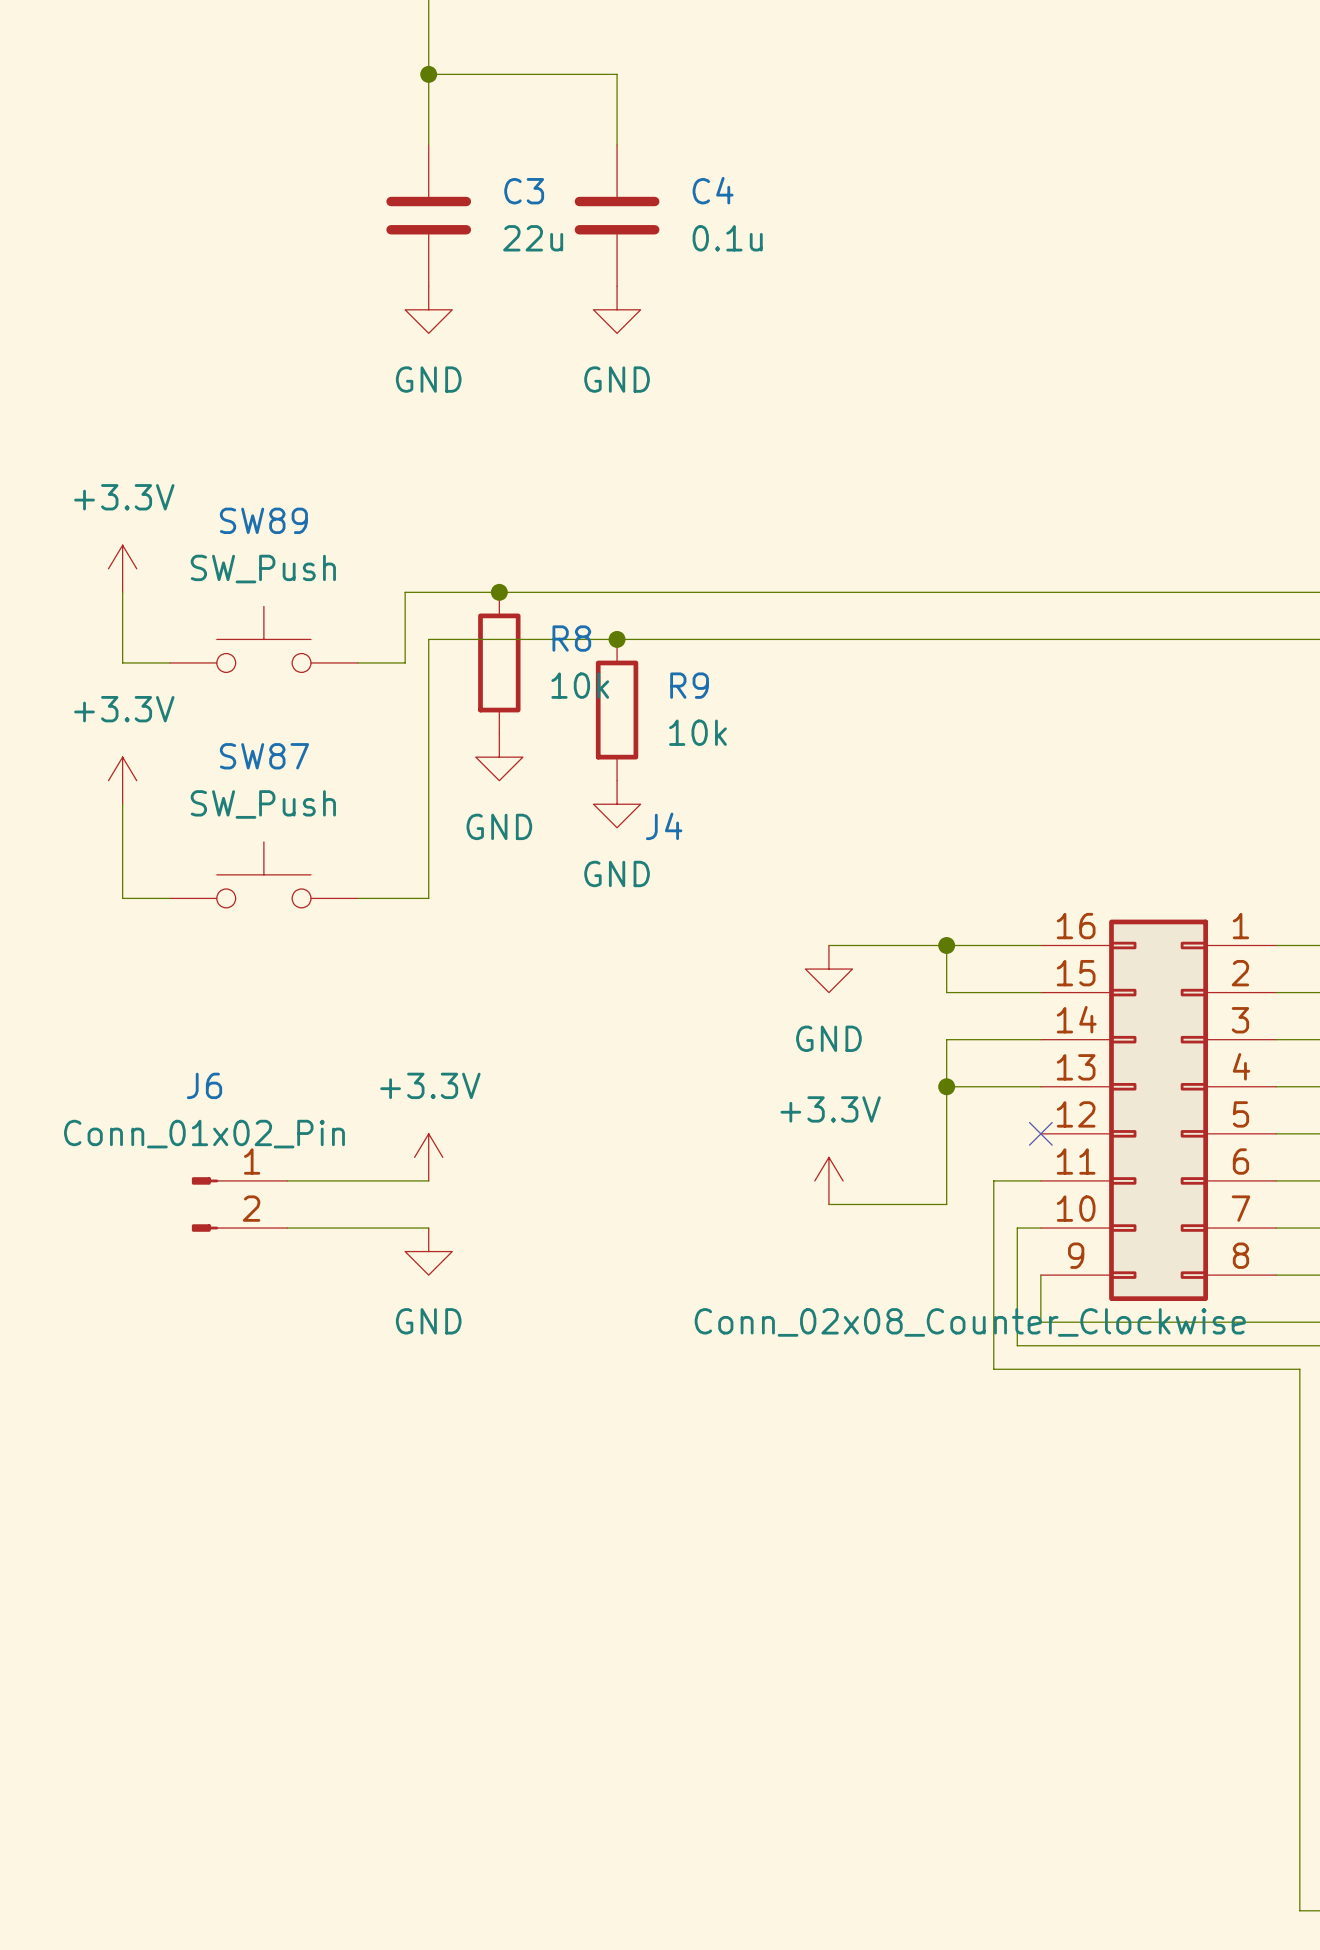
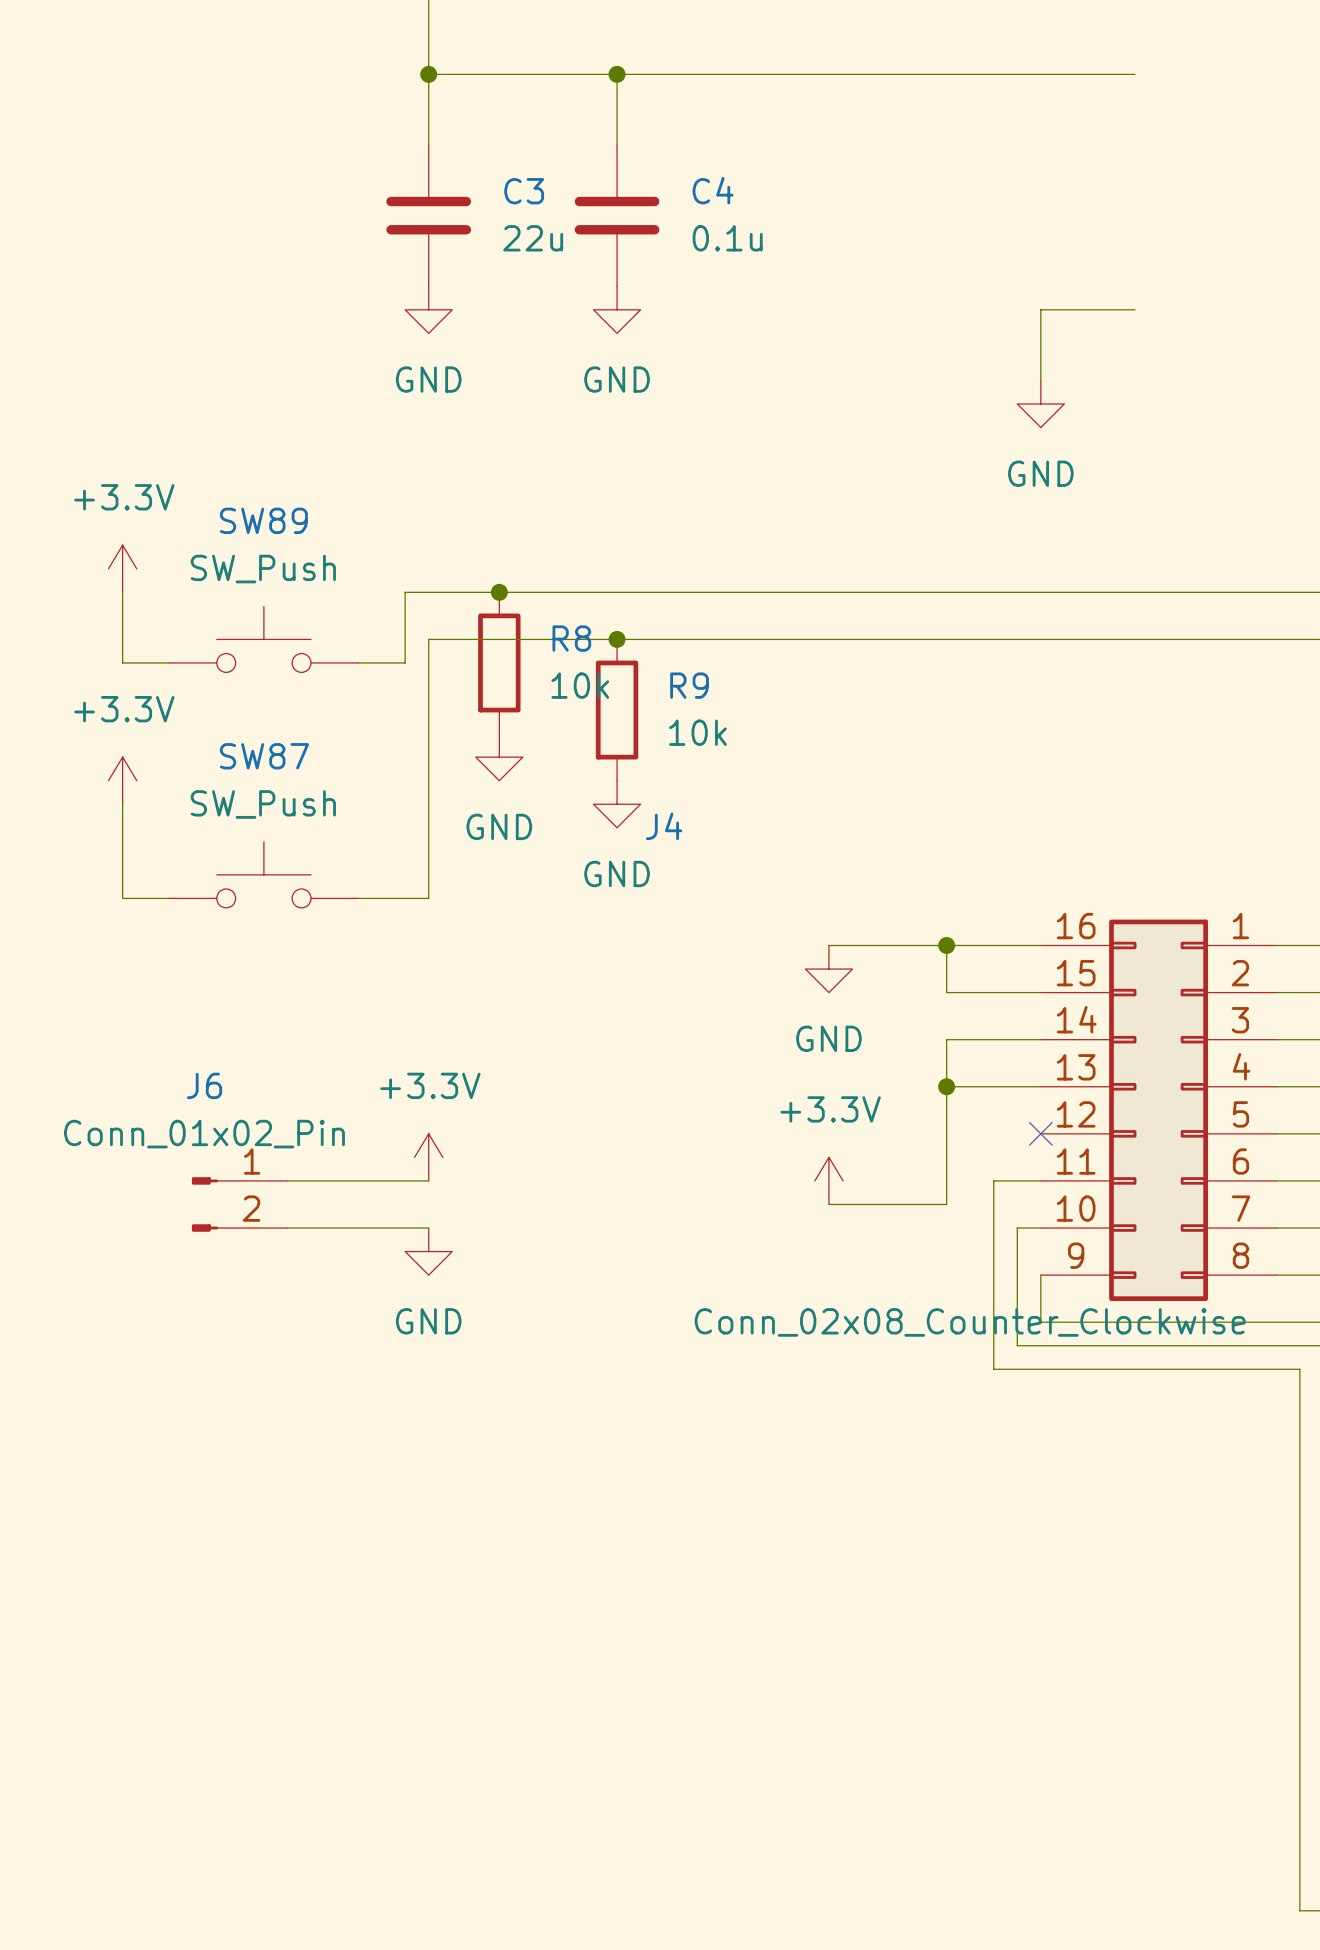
wire: none -> (617, 74) (1135, 74)
junction: none -> (617, 74)
wire: none -> (1135, 309) (1040, 309) (1040, 380)
power symbol: none -> GND (1040, 403)

